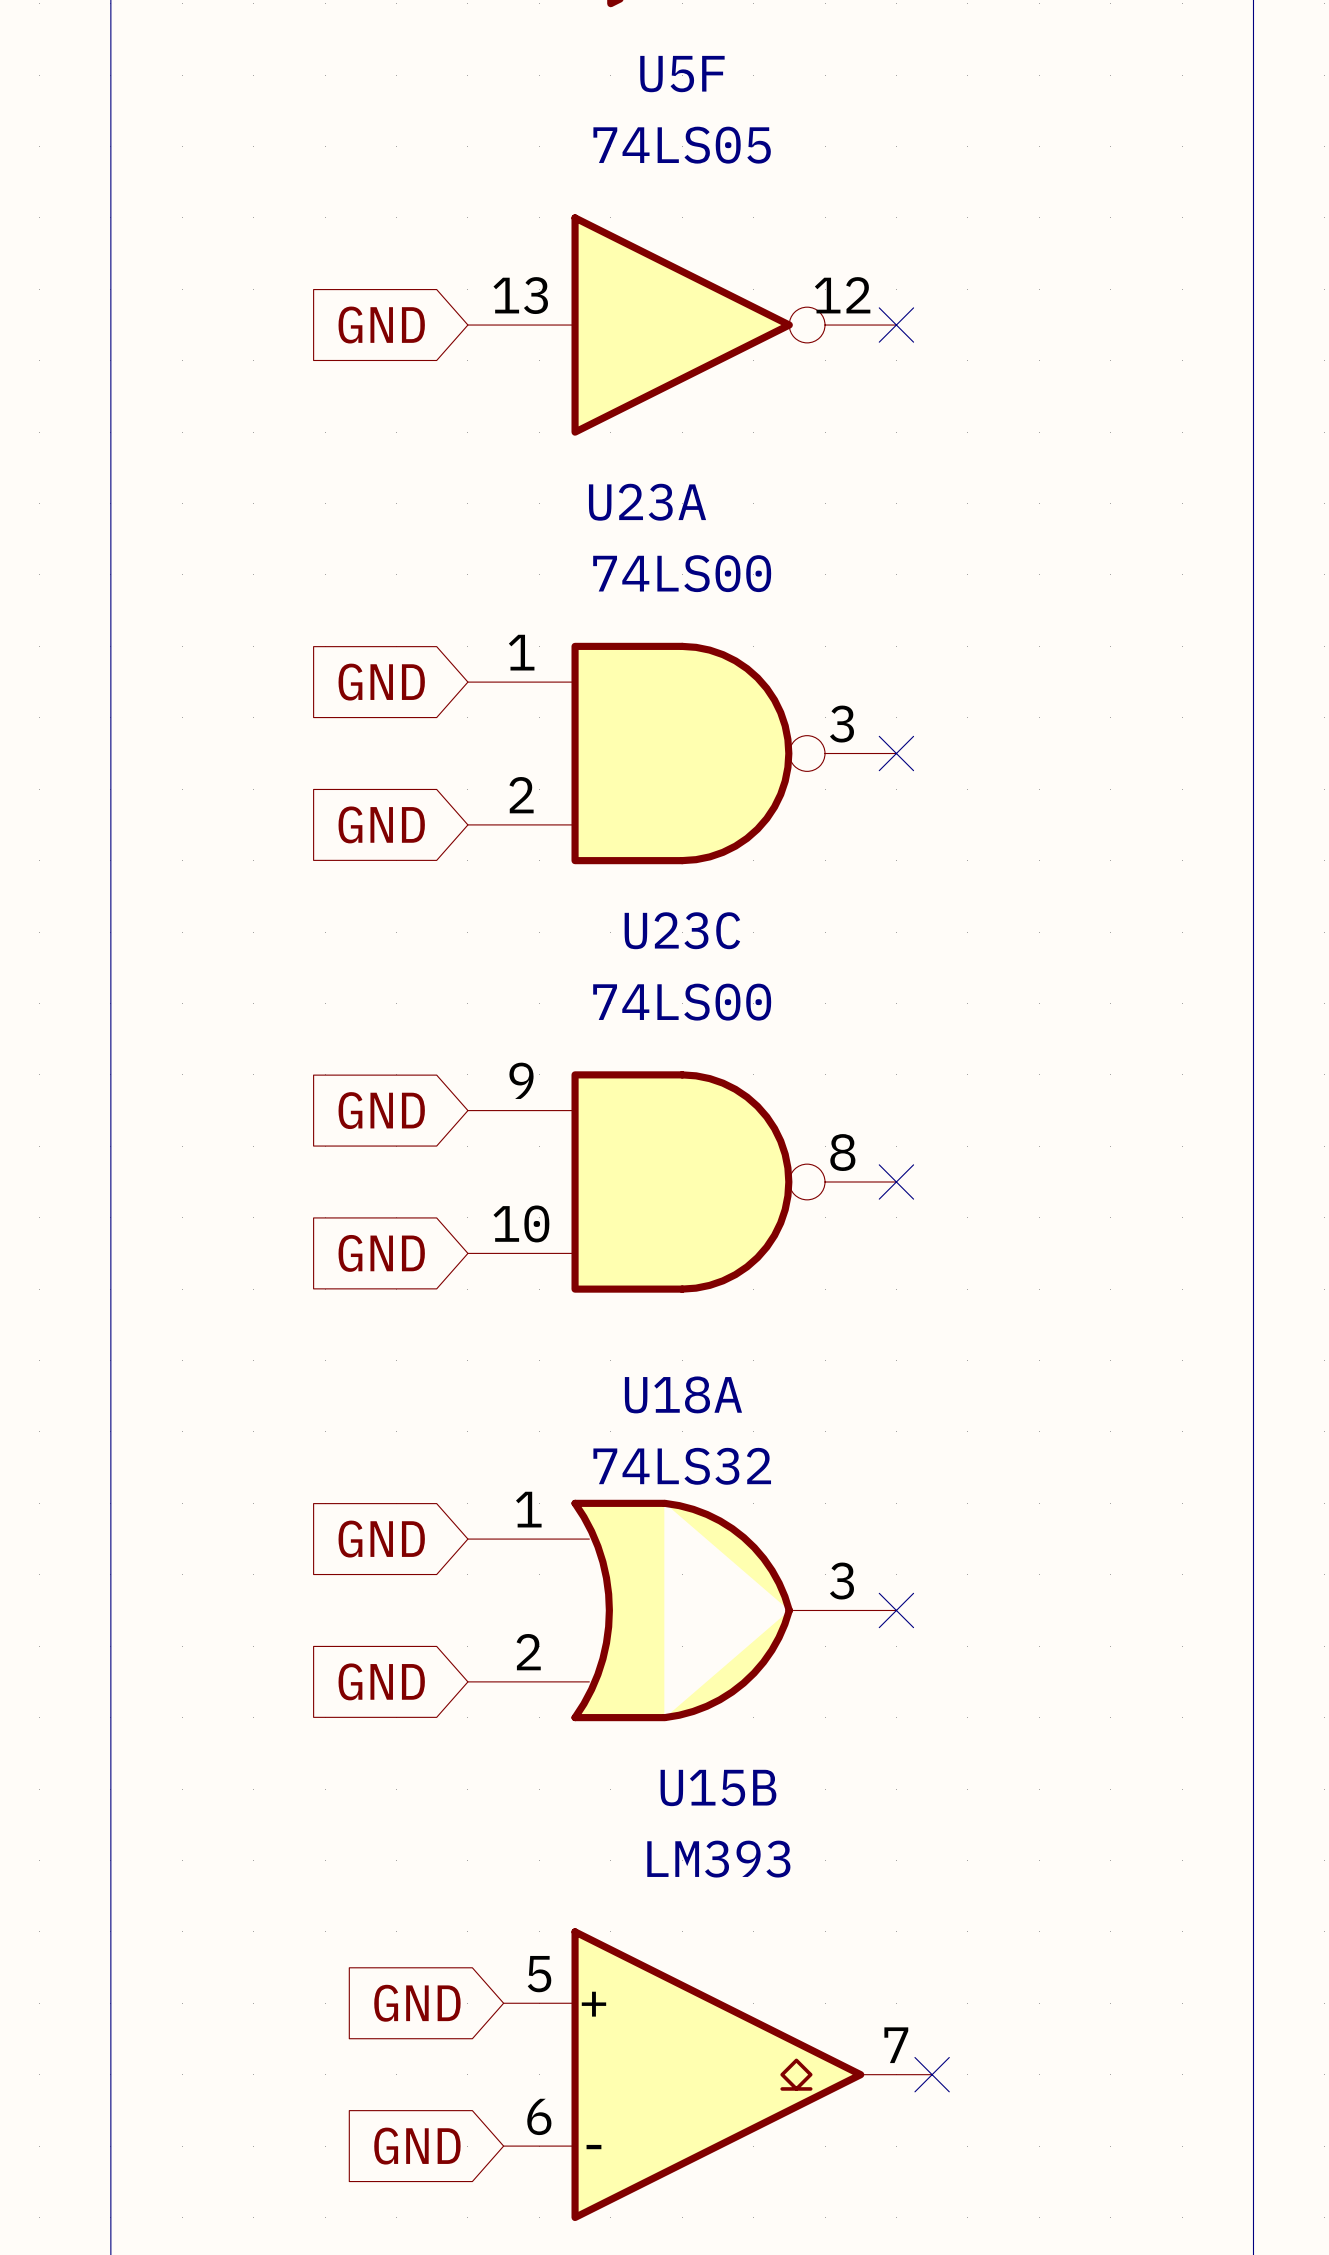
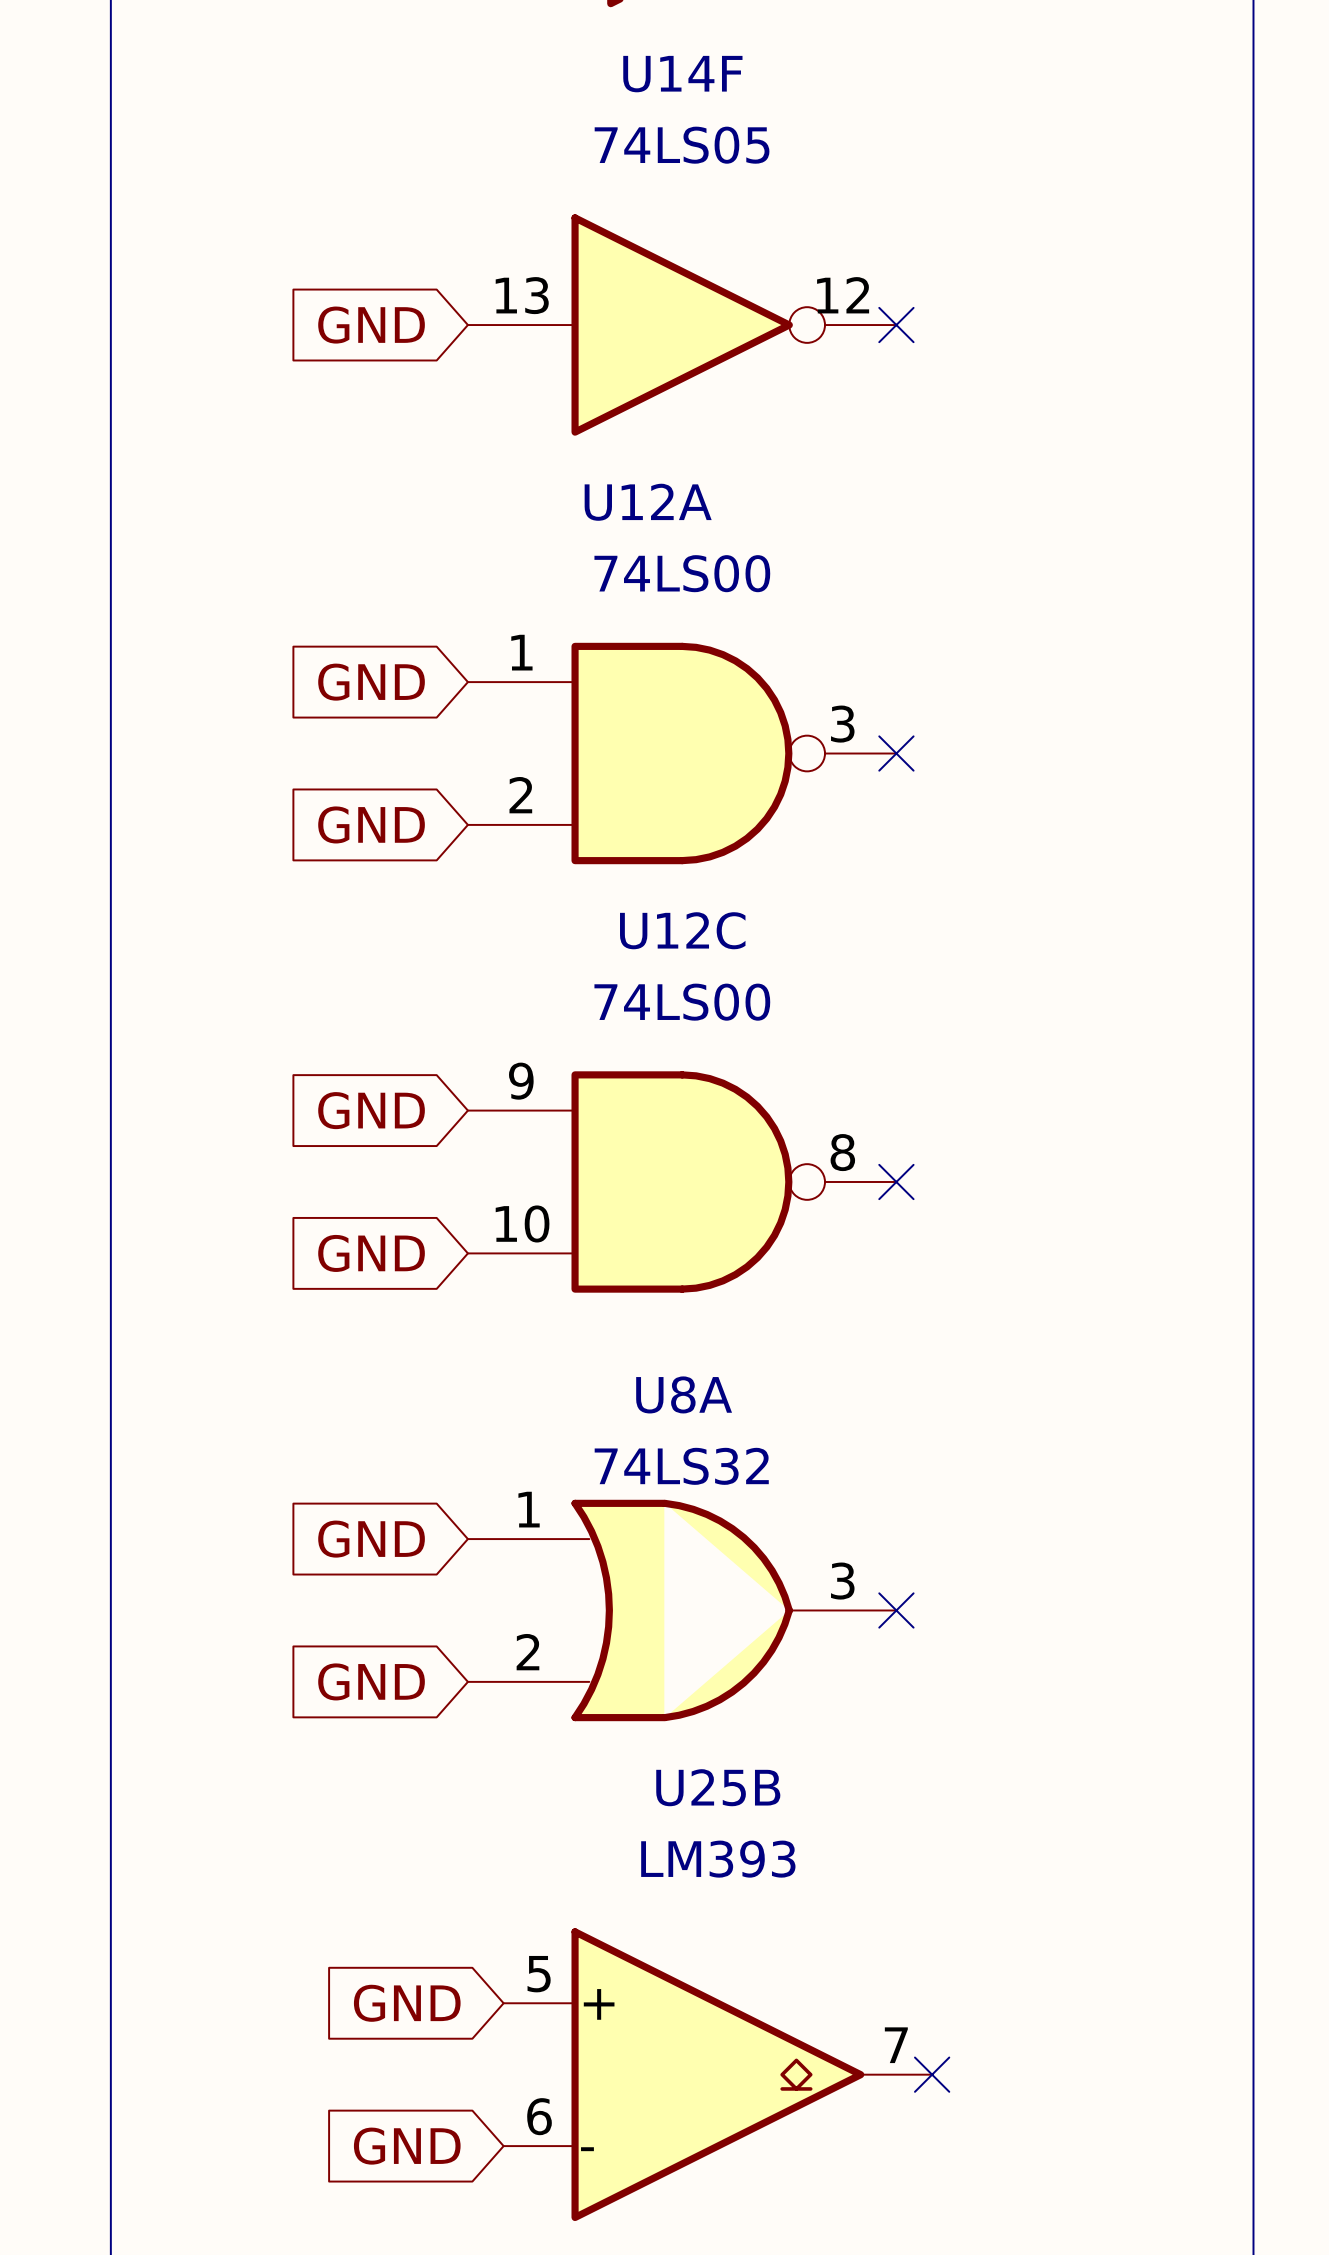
U5F name: U5F (682, 74) -> U14F (682, 74)
U23A name: U23A (647, 502) -> U12A (648, 502)
U23C name: U23C (682, 930) -> U12C (682, 930)
U18A name: U18A (683, 1394) -> U8A (684, 1394)
U15B name: U15B (718, 1787) -> U25B (718, 1787)

